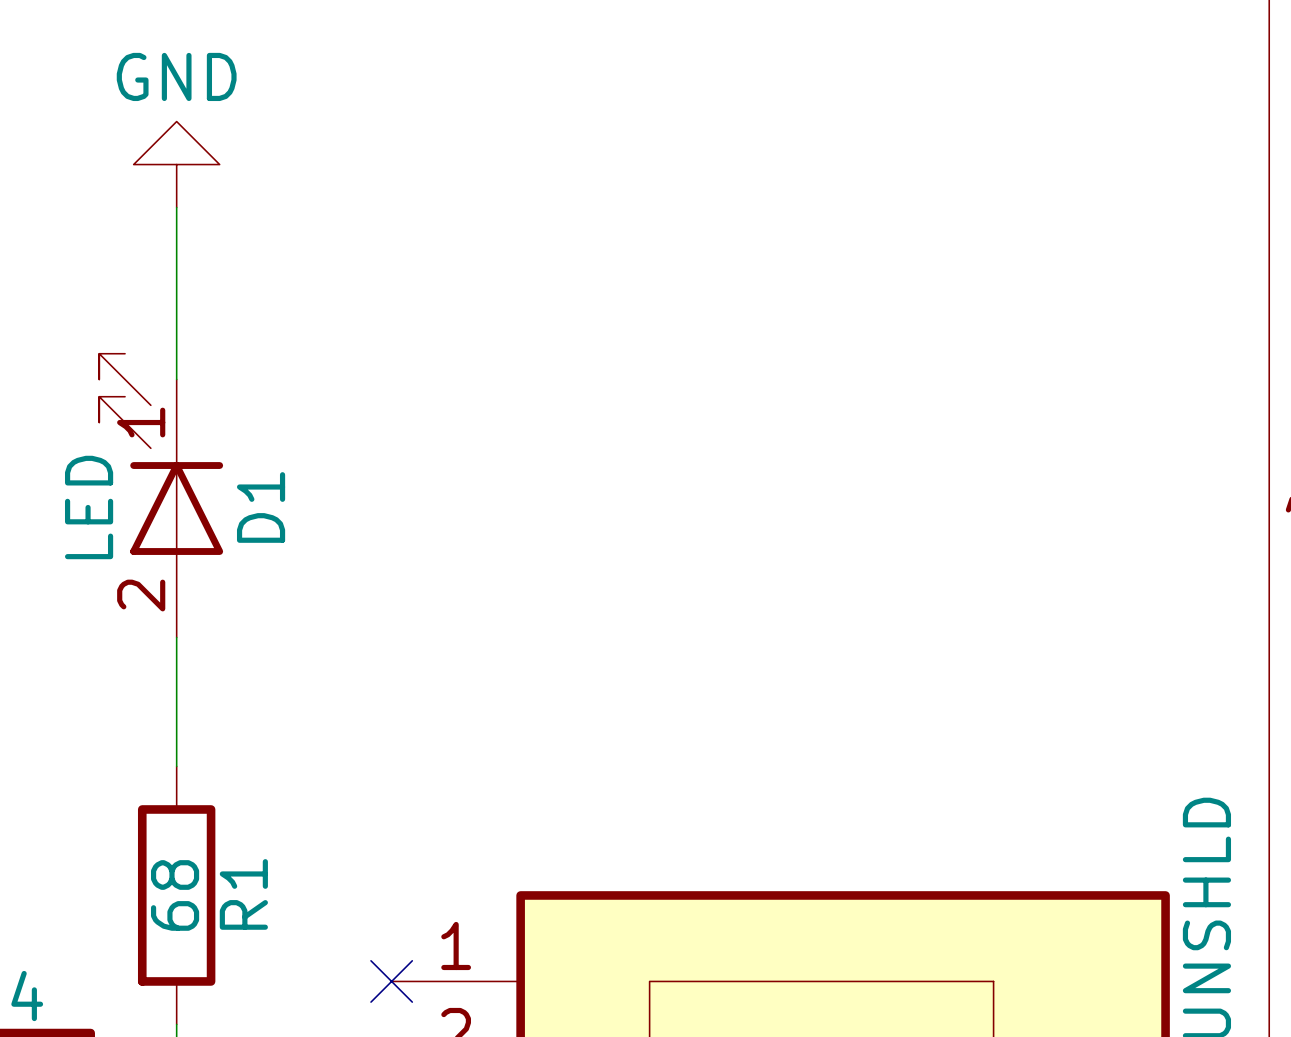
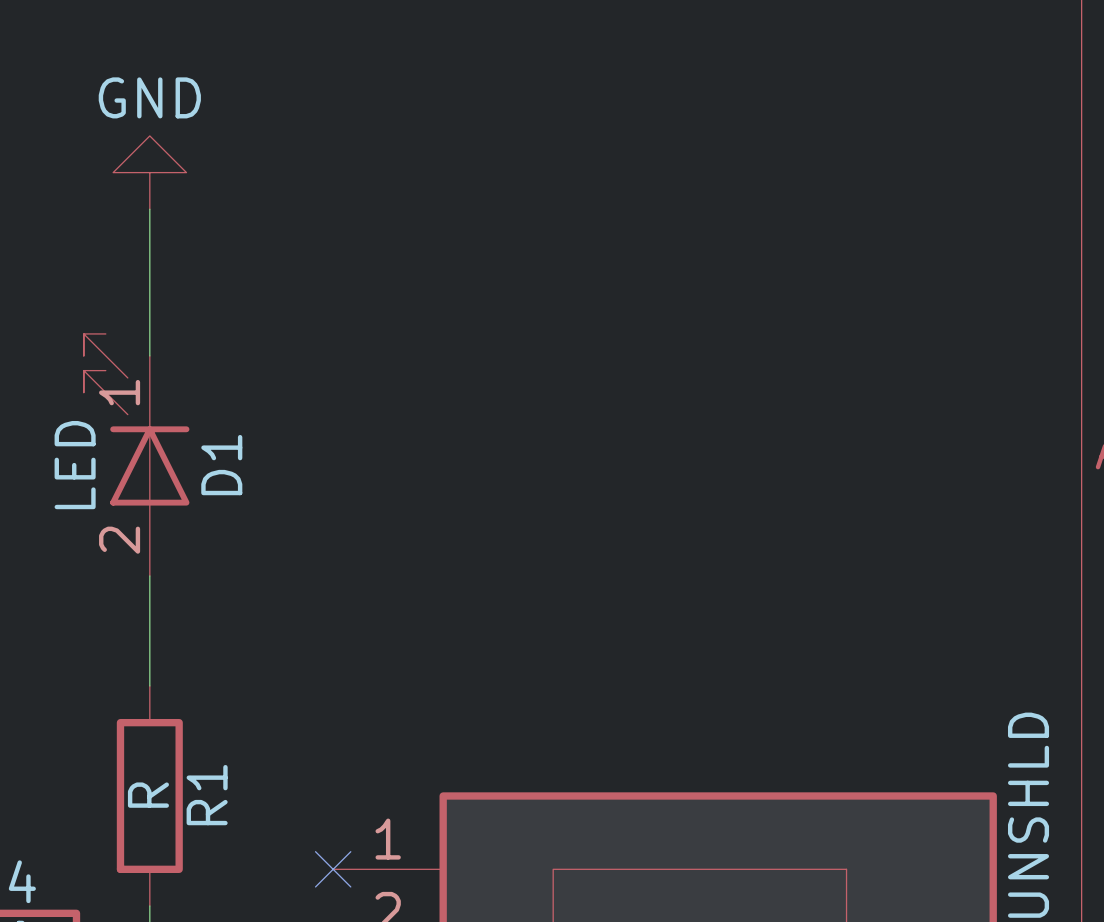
R1 value: 68 (175, 895) -> R (148, 795)

